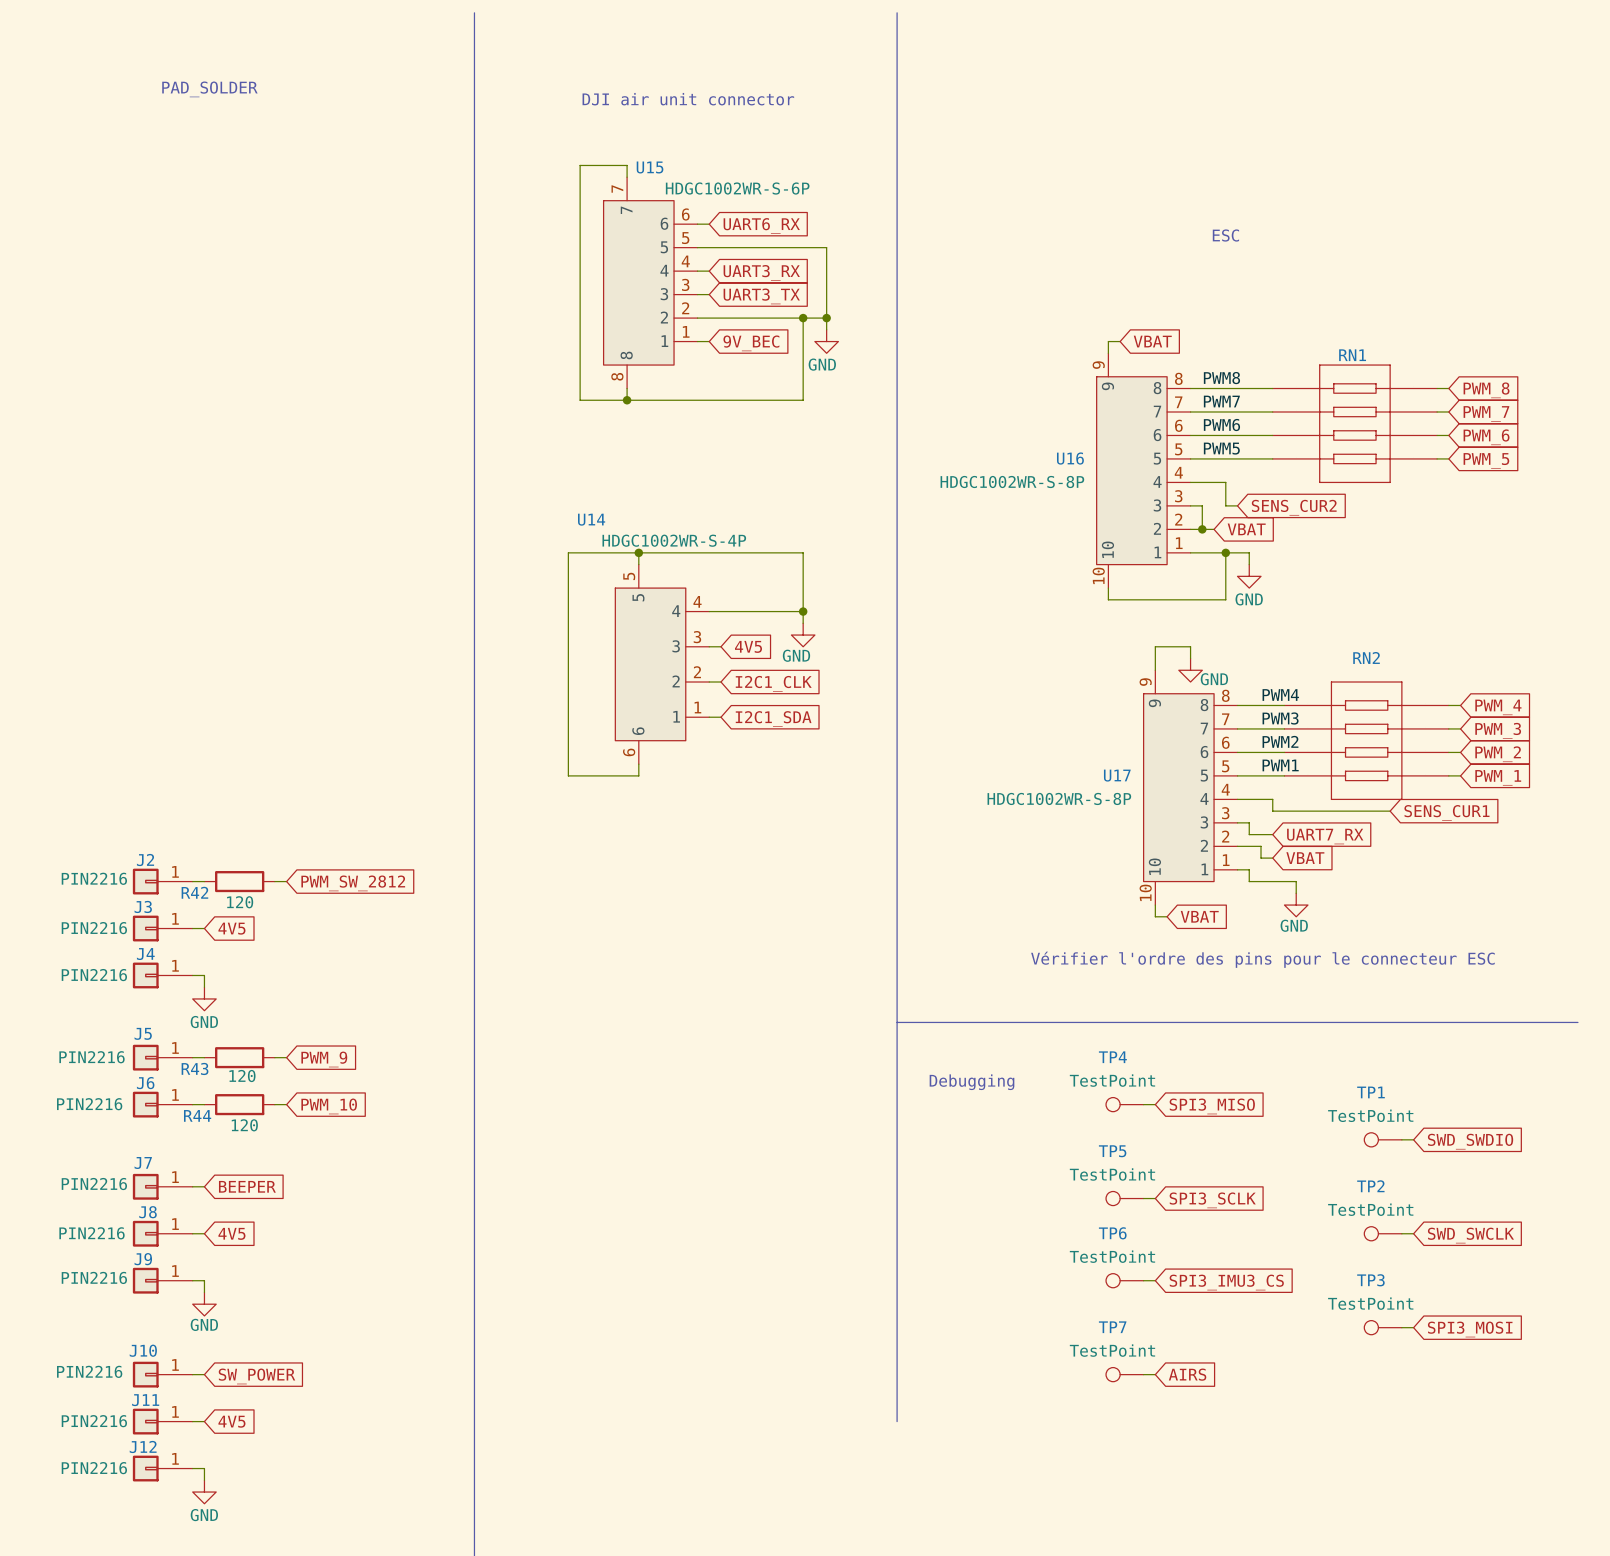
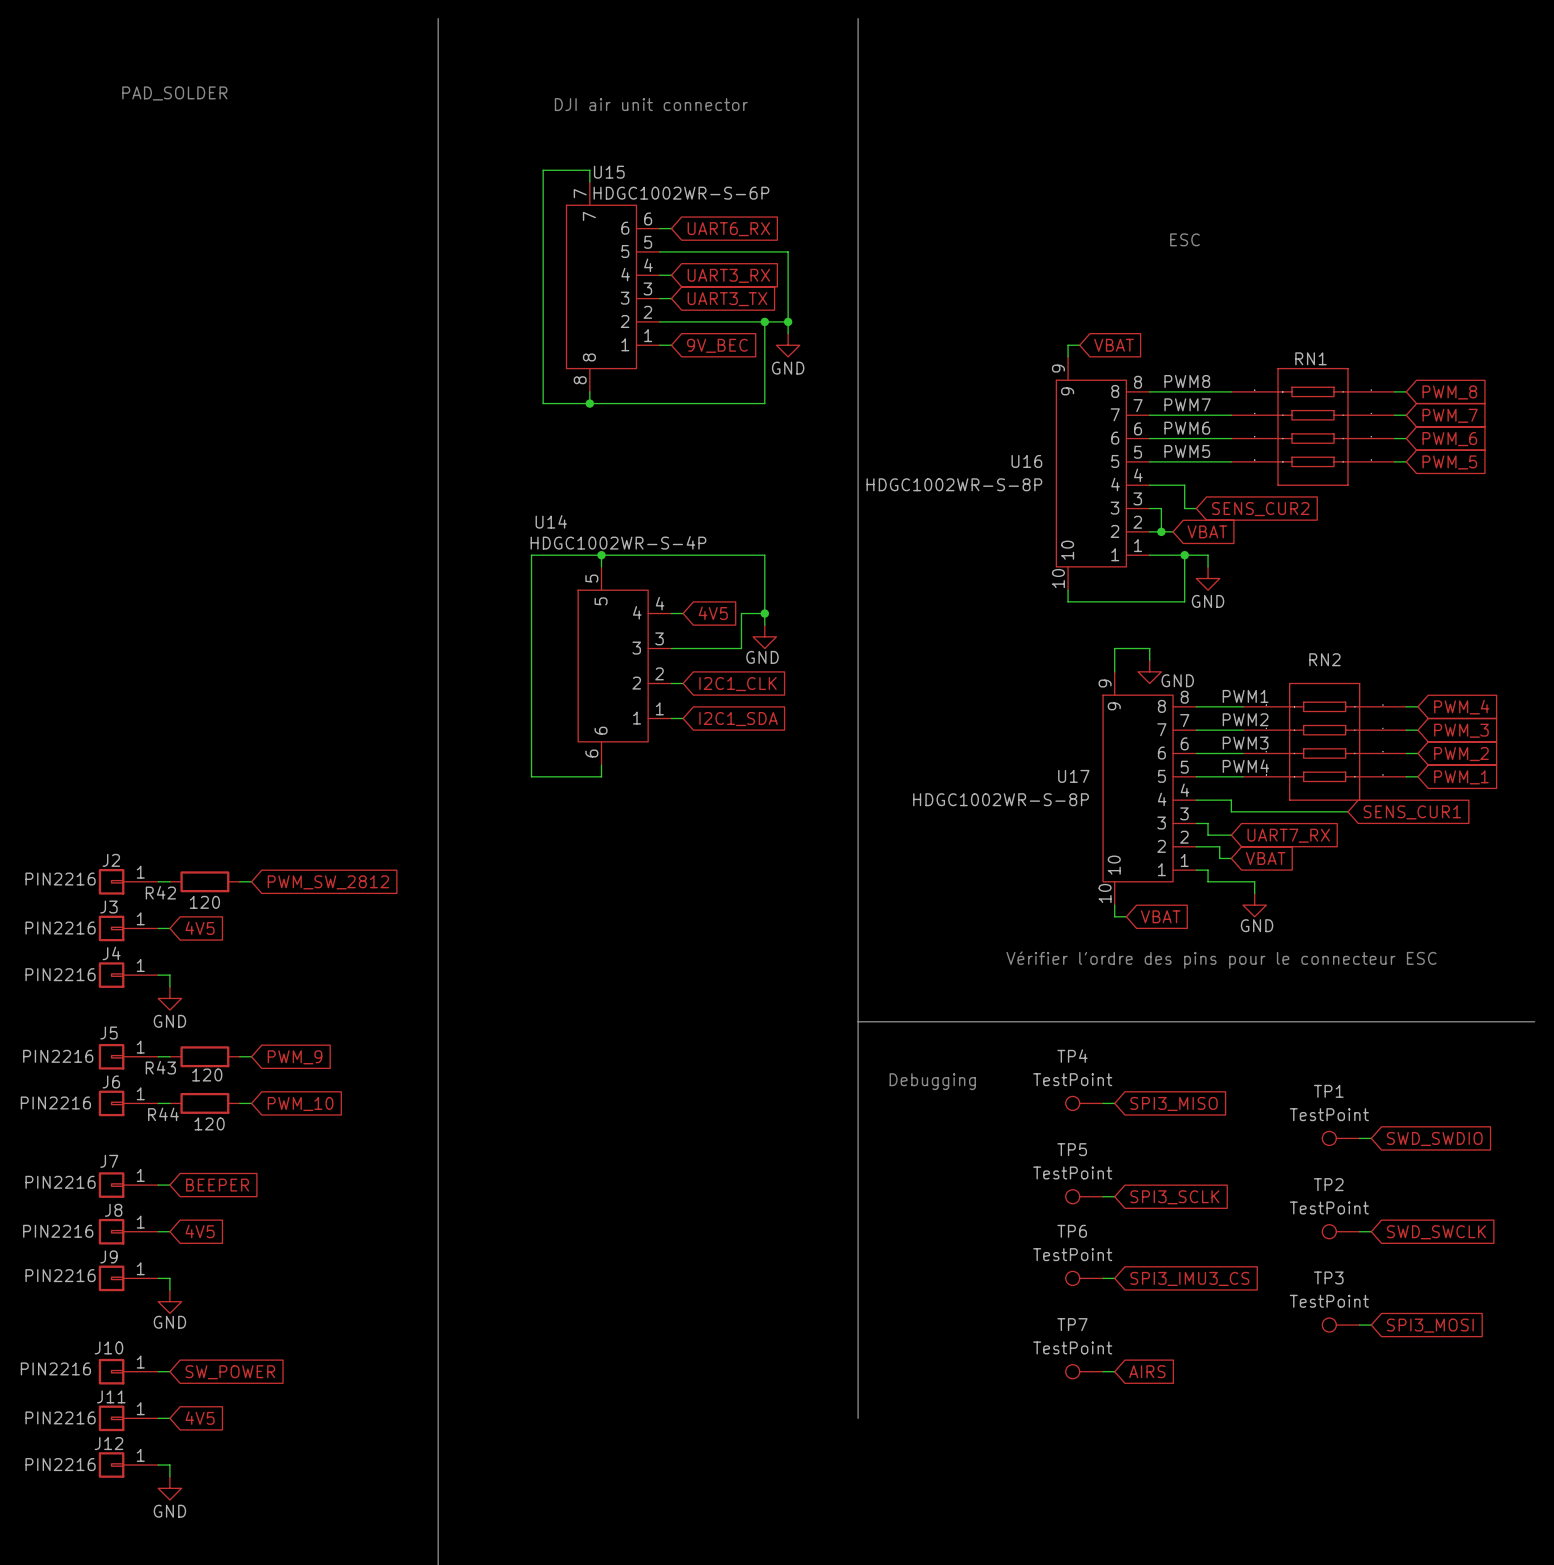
wire: (720, 611) (779, 611) -> (683, 648) (741, 648) (741, 613)
global label position: 4V5 (748, 646) -> 4V5 (713, 613)
label: PWM4 (1280, 695) -> PWM1 (1245, 696)
label: PWM3 (1280, 718) -> PWM2 (1245, 719)
label: PWM2 (1280, 741) -> PWM3 (1245, 743)
label: PWM1 (1280, 765) -> PWM4 (1245, 766)

